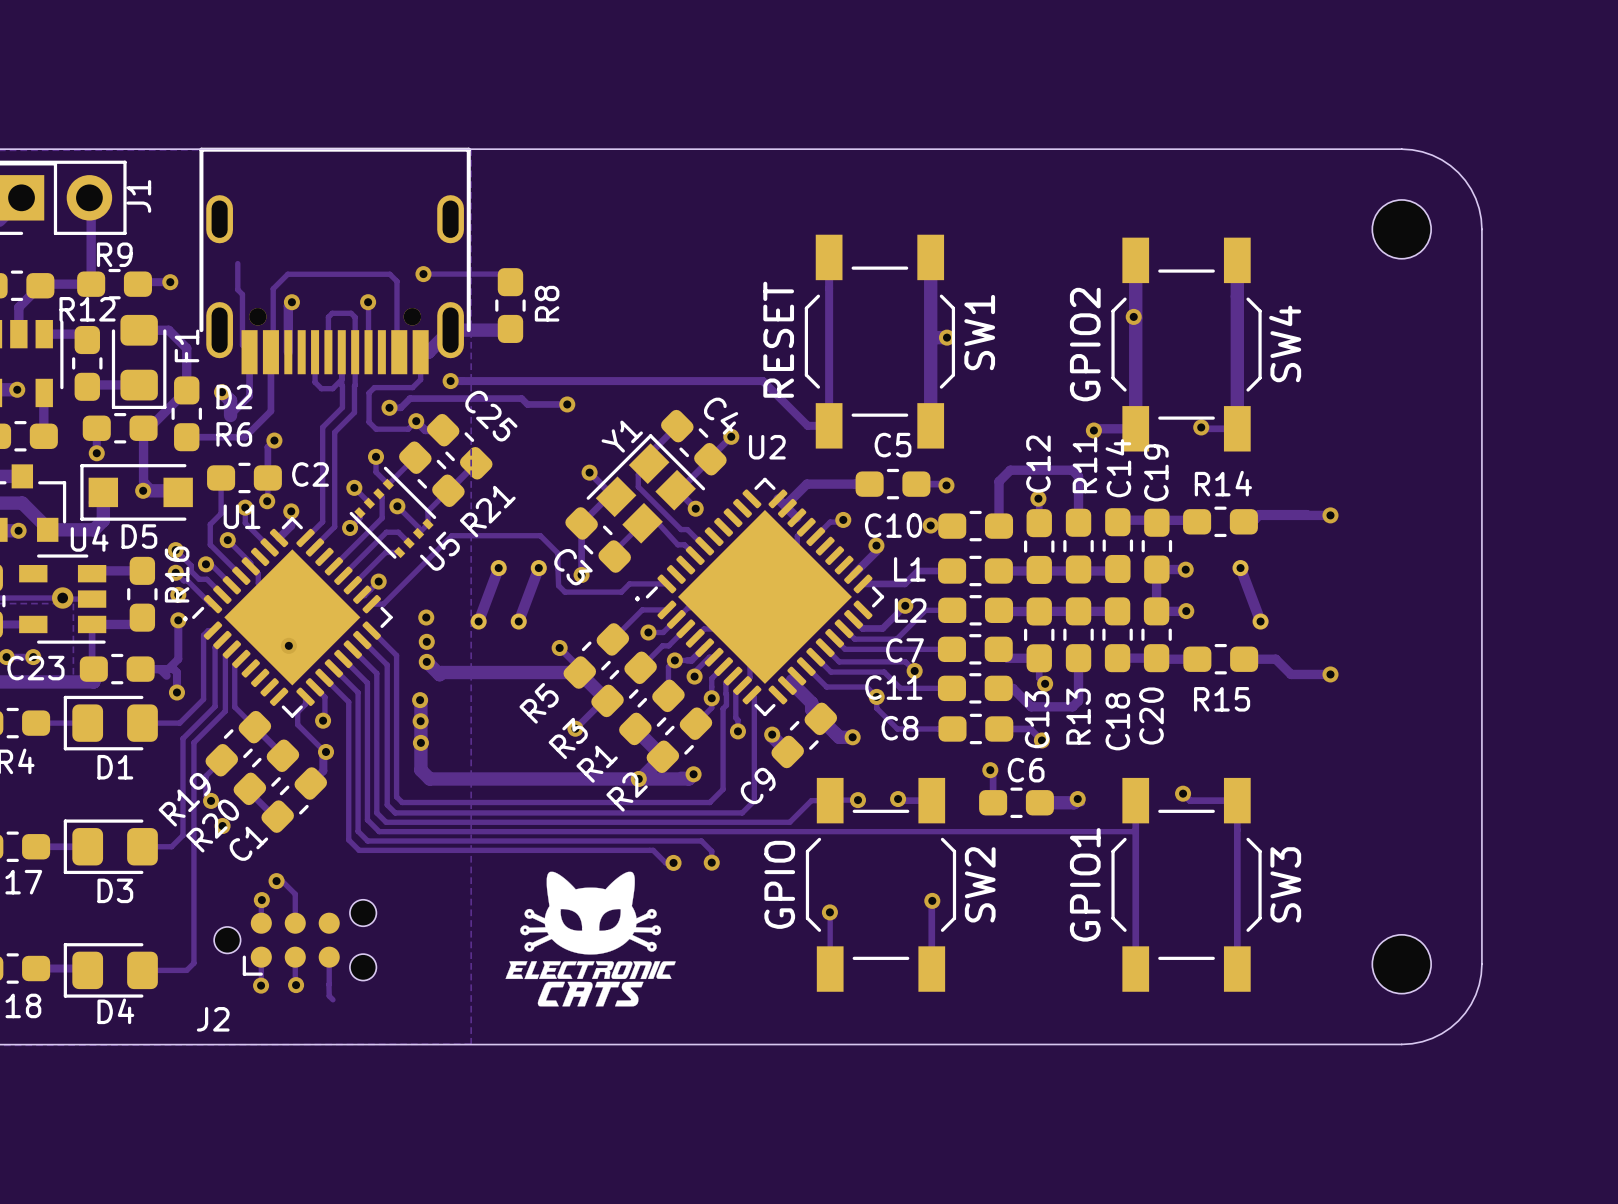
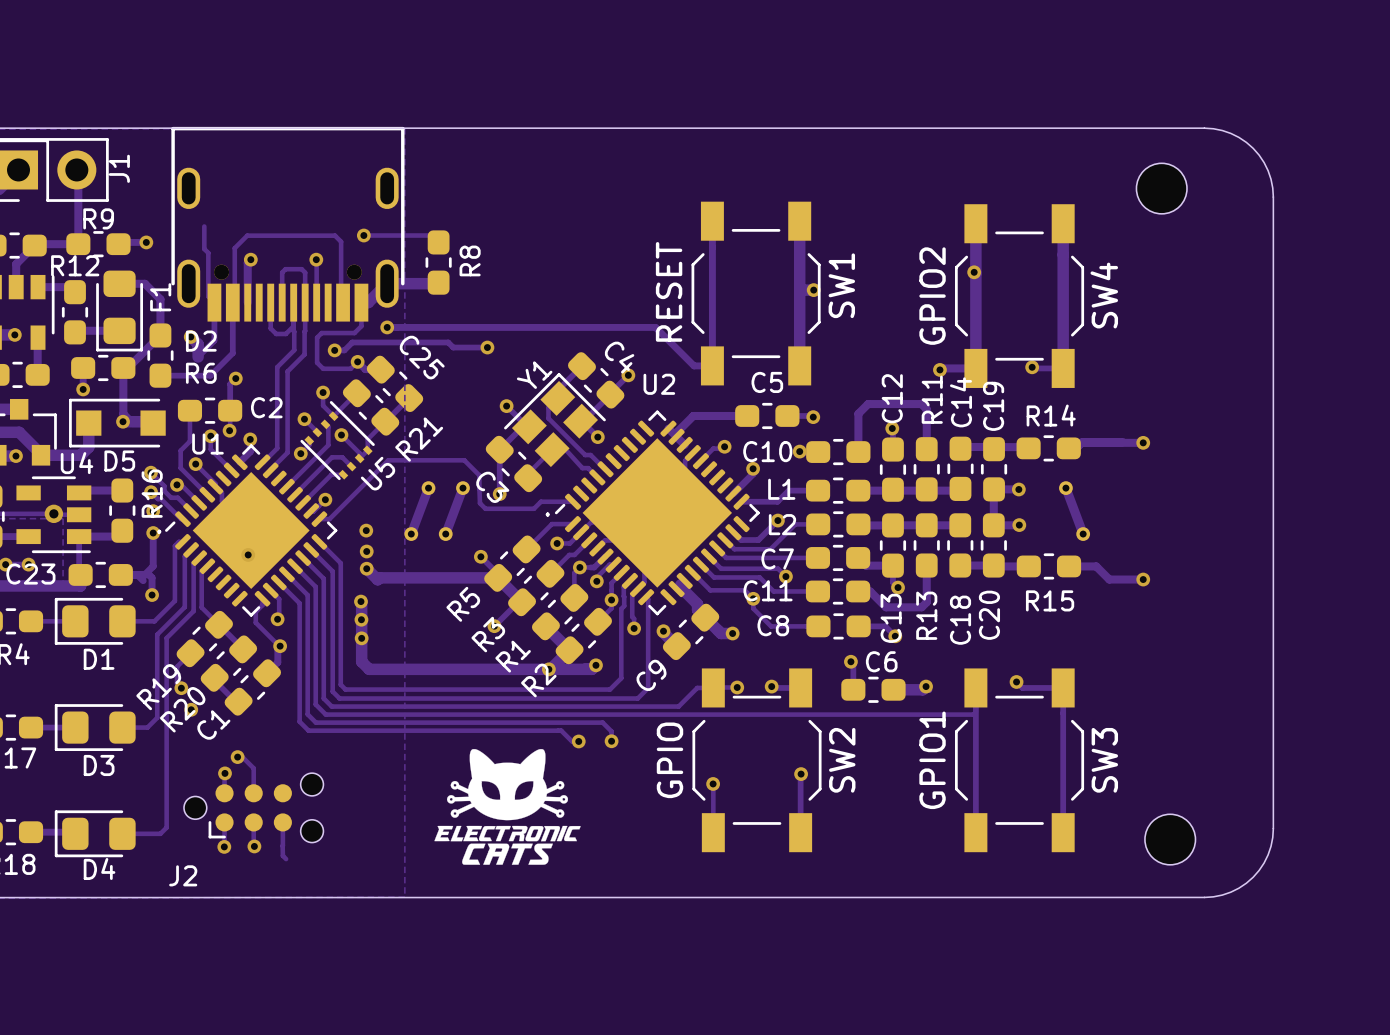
part position: (1401, 229) -> (1161, 188)
part position: (1401, 964) -> (1170, 839)

